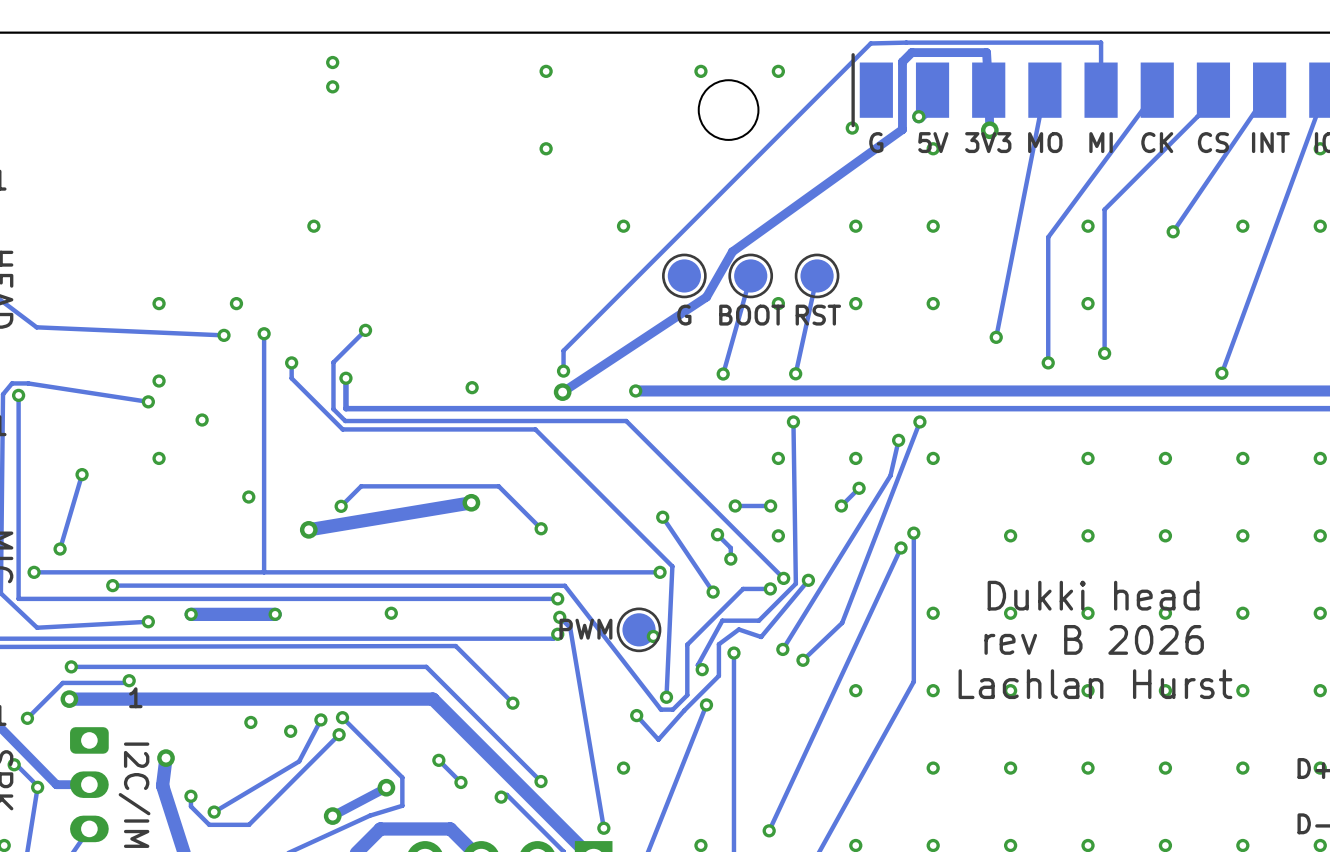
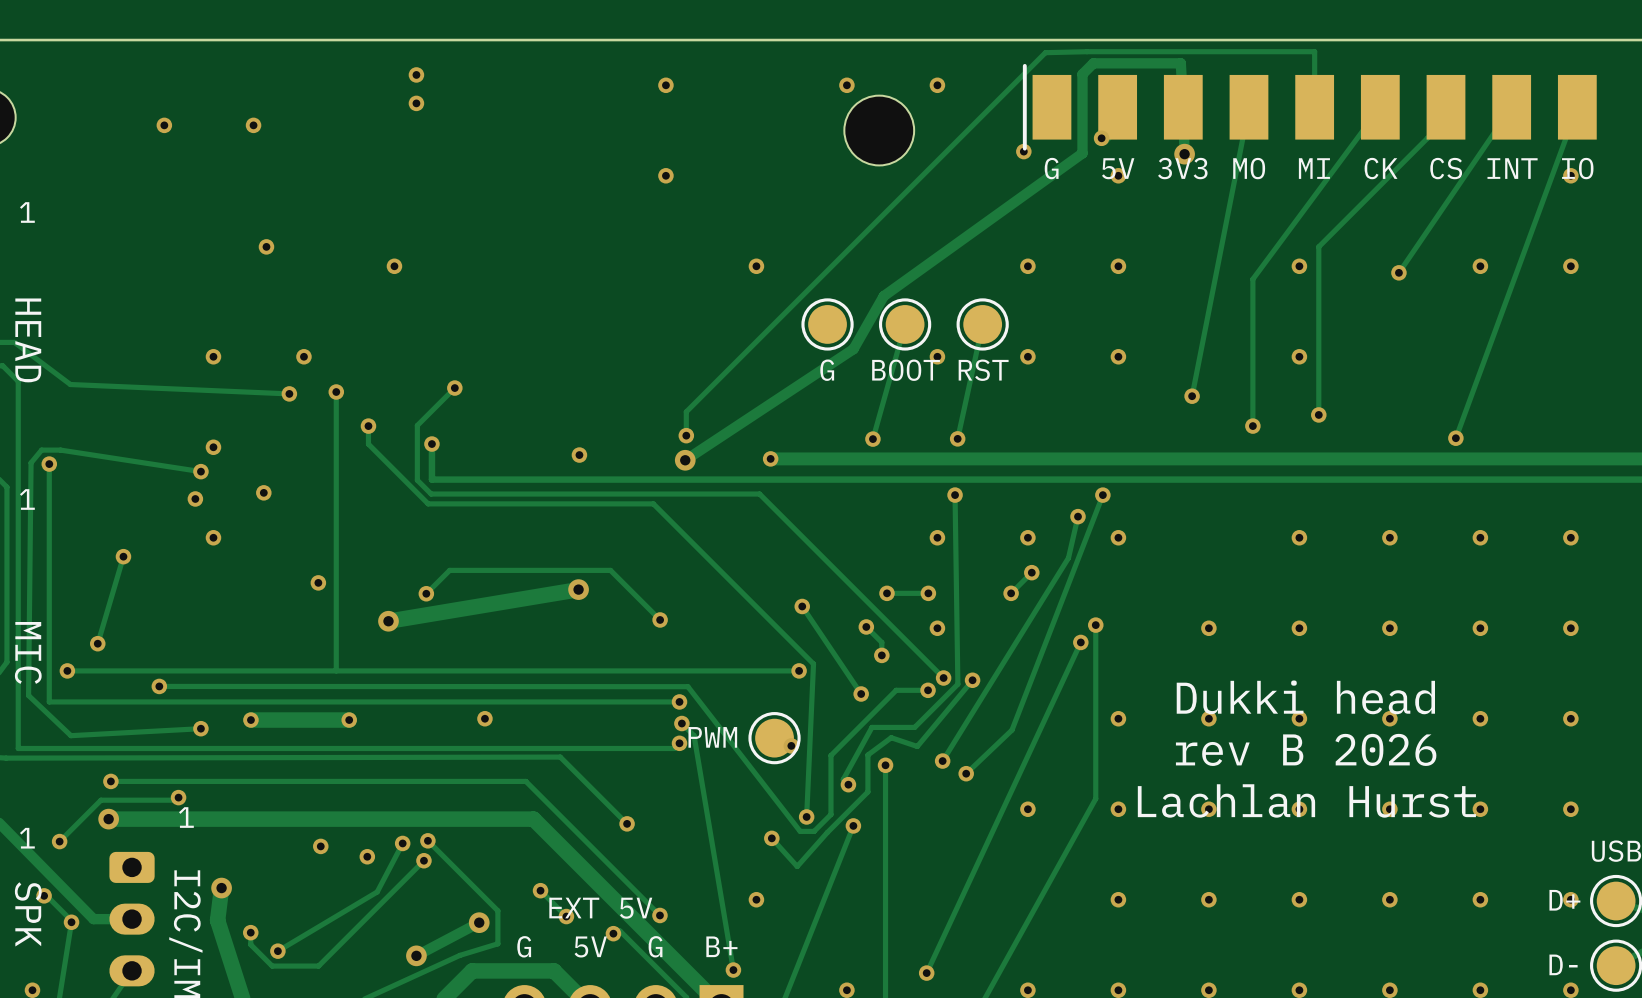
via: none -> (164, 125)
via: none -> (253, 125)
via: none -> (266, 246)
via: none -> (195, 498)
text: none -> EXT 5V (600, 908)
text: none -> G (524, 946)
text: none -> 5V (590, 946)
text: none -> G (655, 946)
text: none -> B+ (721, 946)

